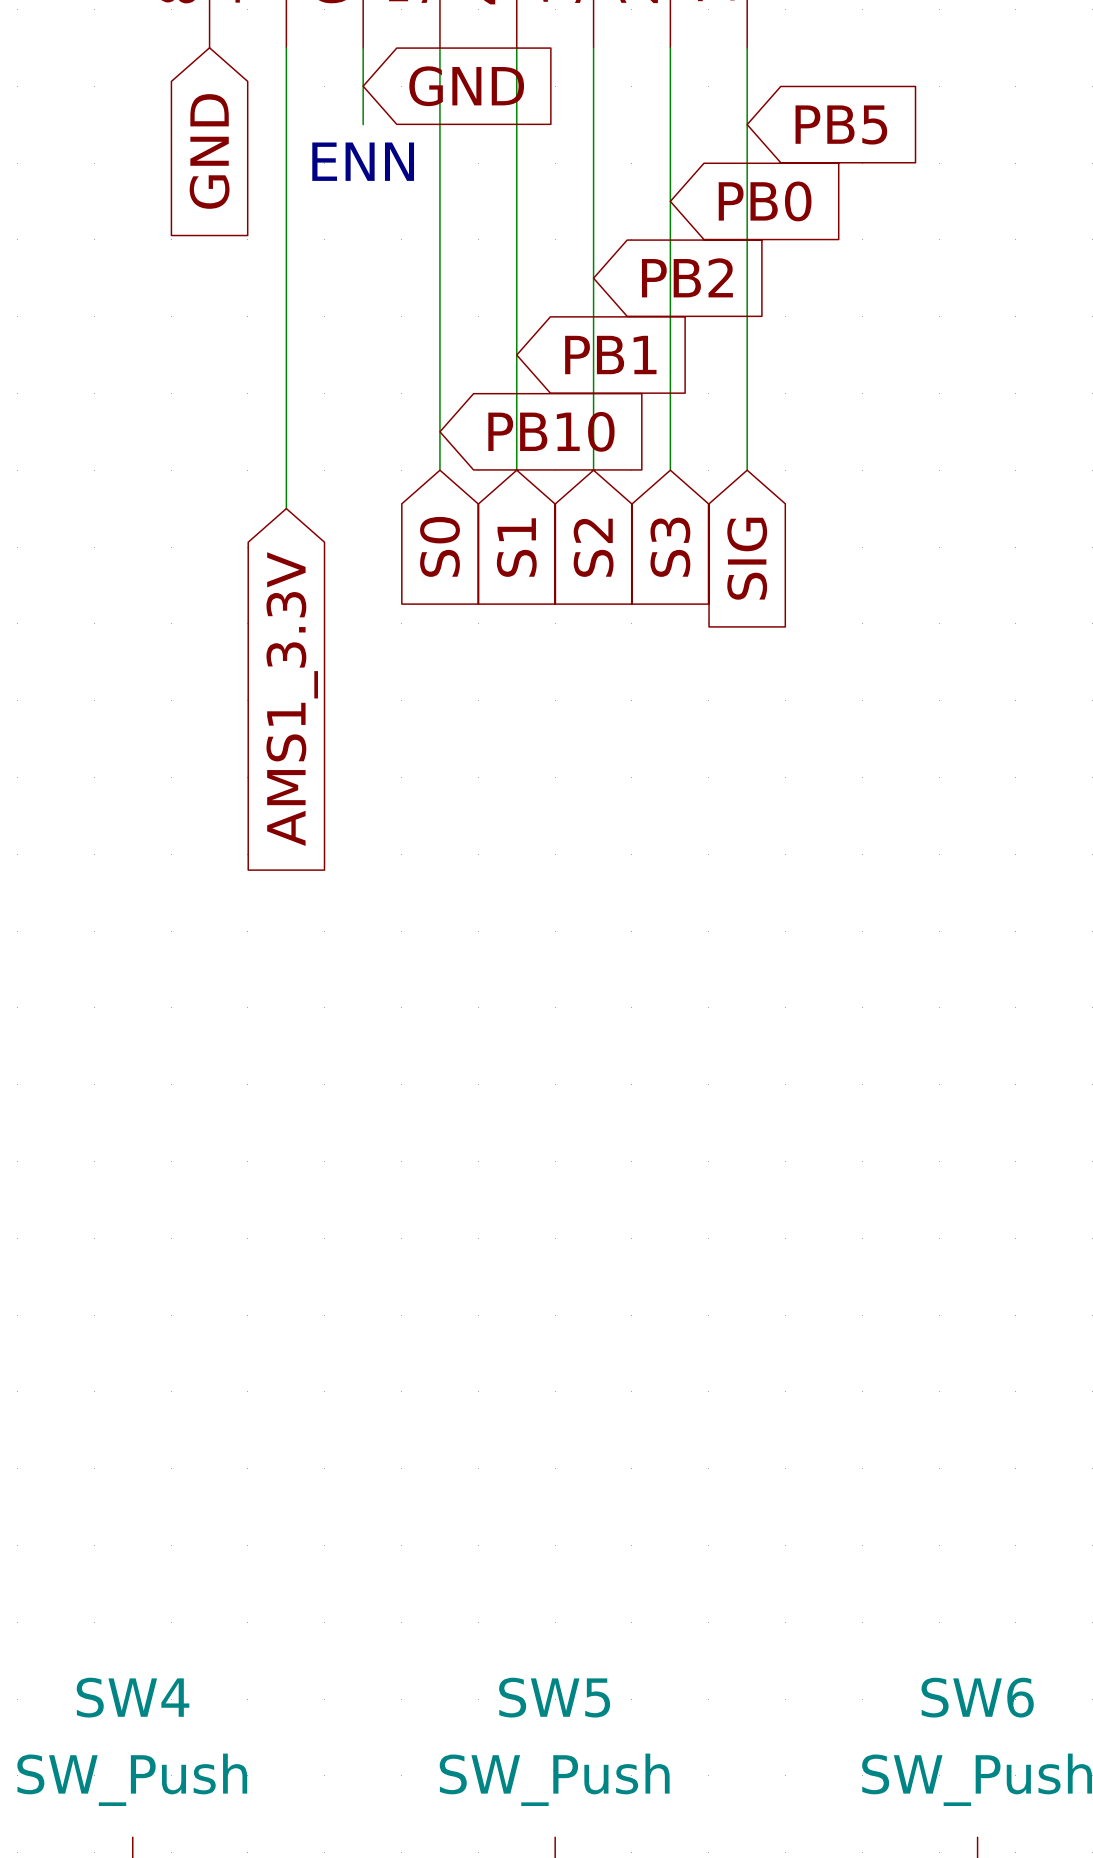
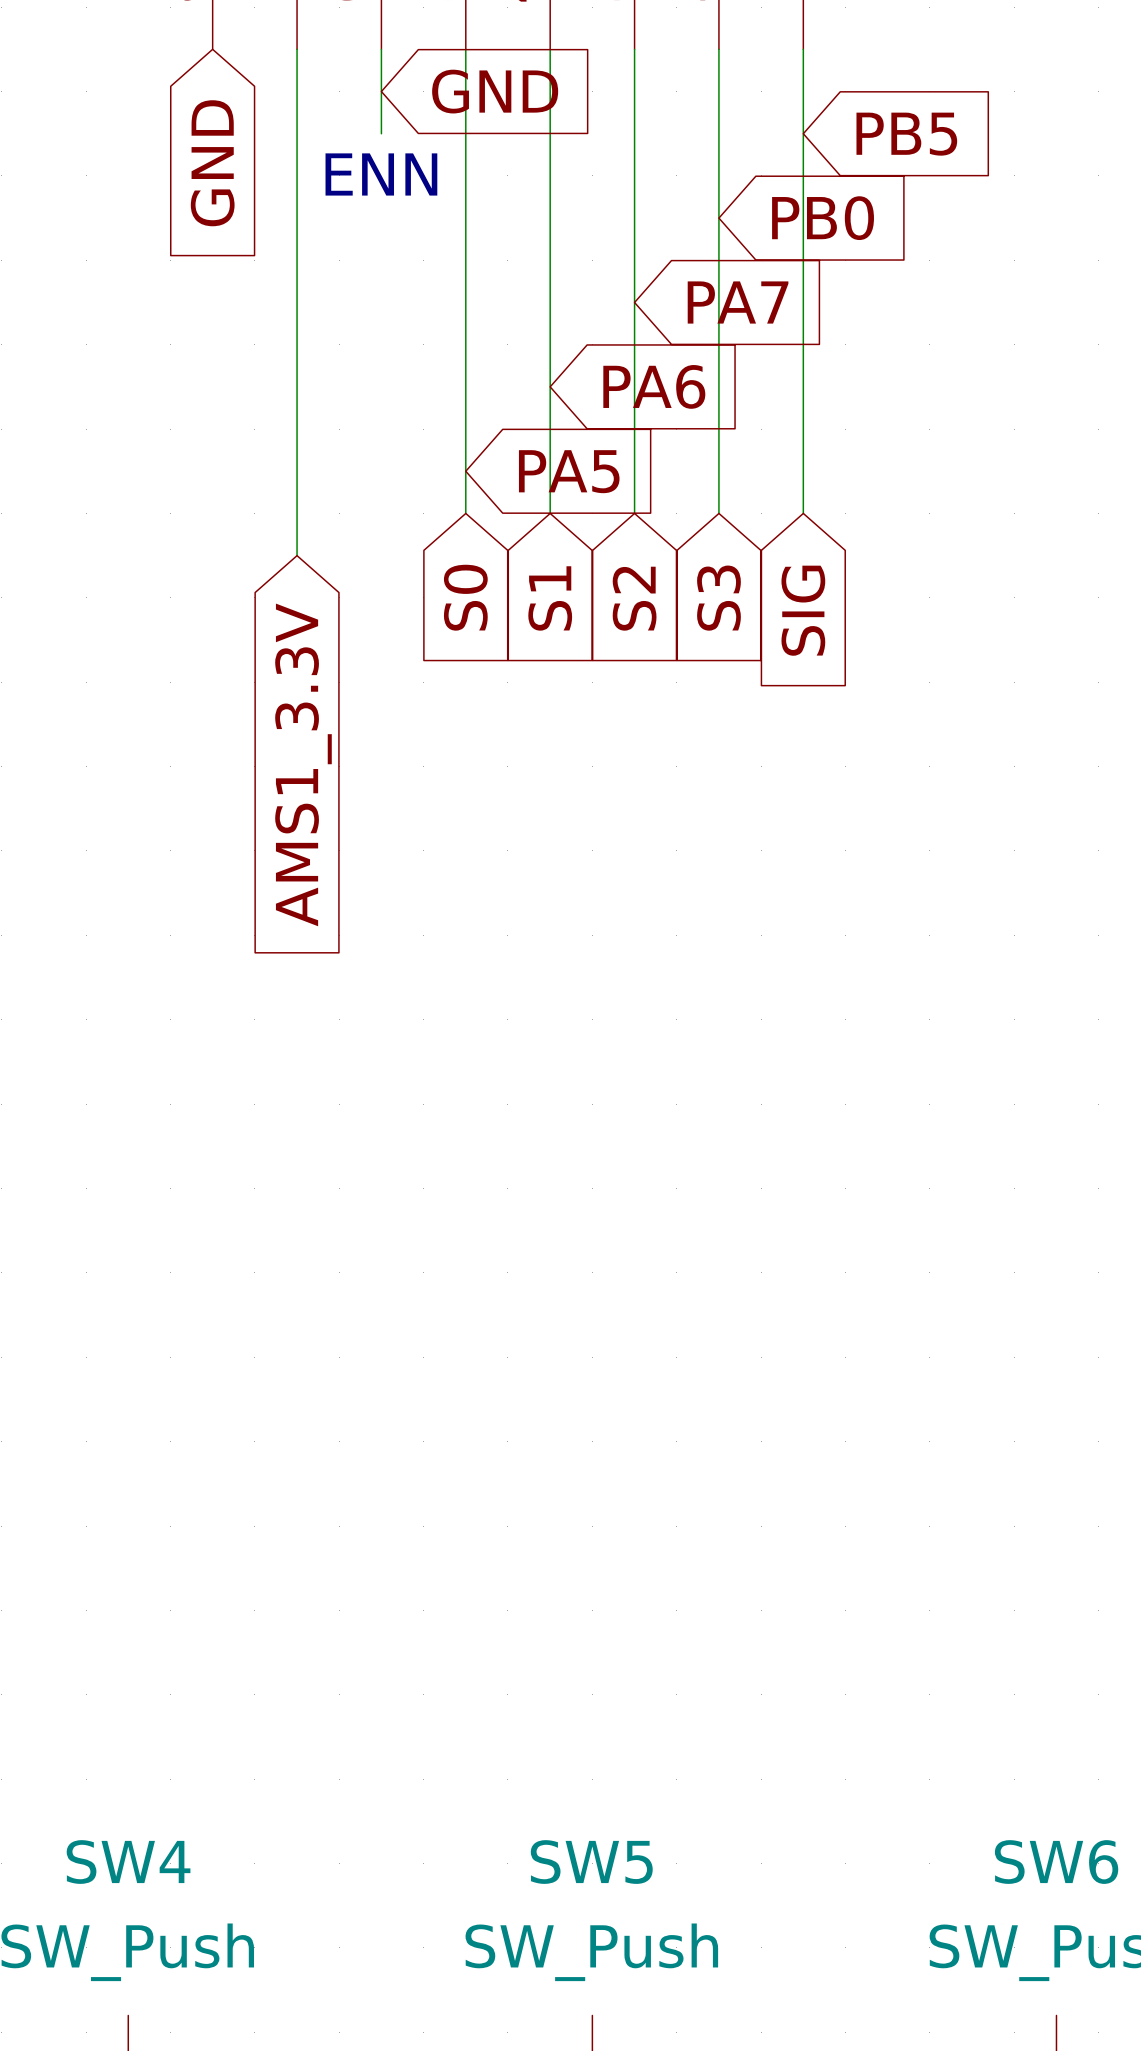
global label: PB2 (687, 277) -> PA7 (738, 302)
global label: PB1 (610, 355) -> PA6 (654, 386)
global label: PB10 (551, 431) -> PA5 (569, 471)

